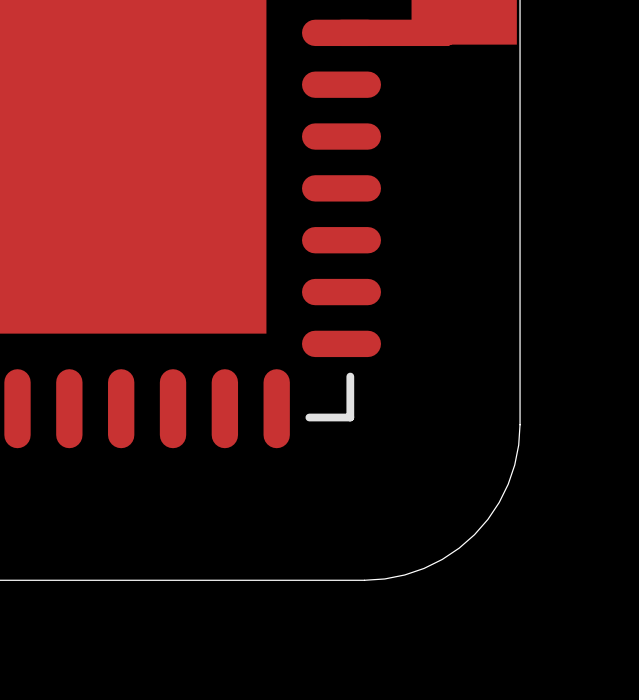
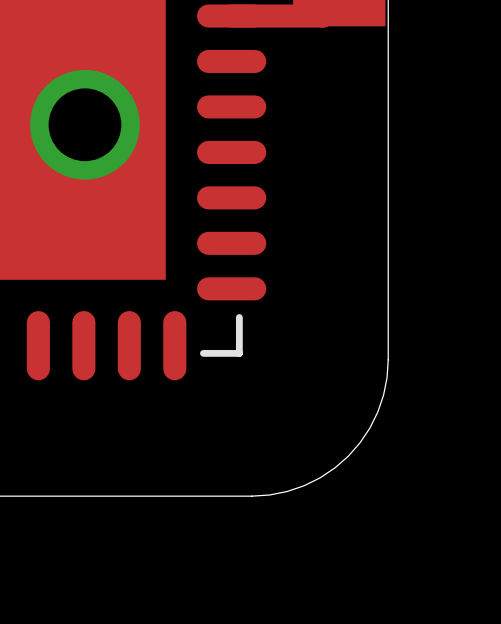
via: none -> (84, 124)

